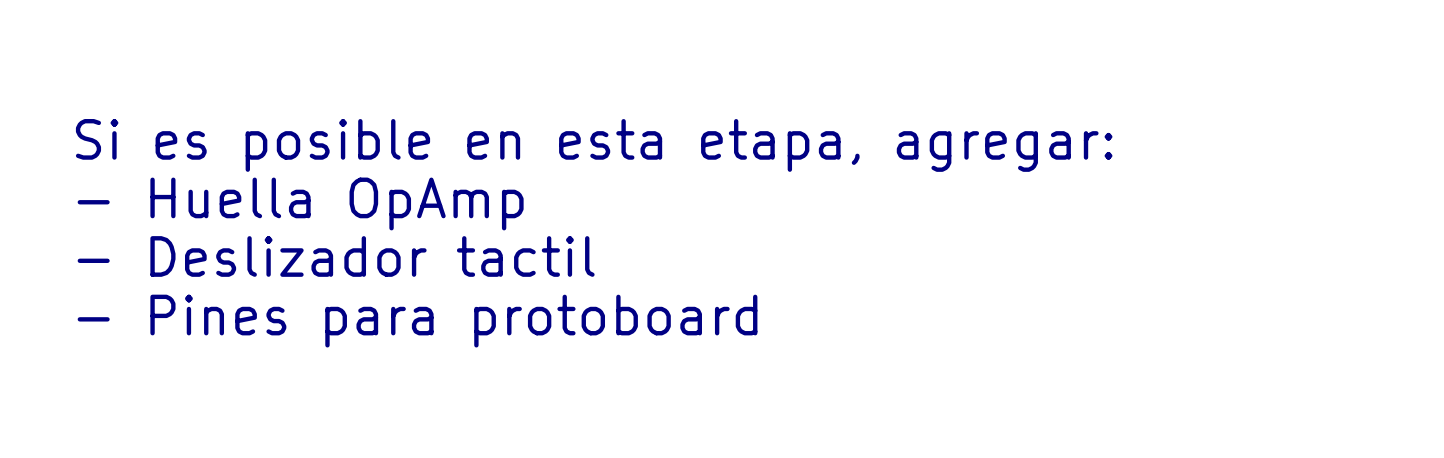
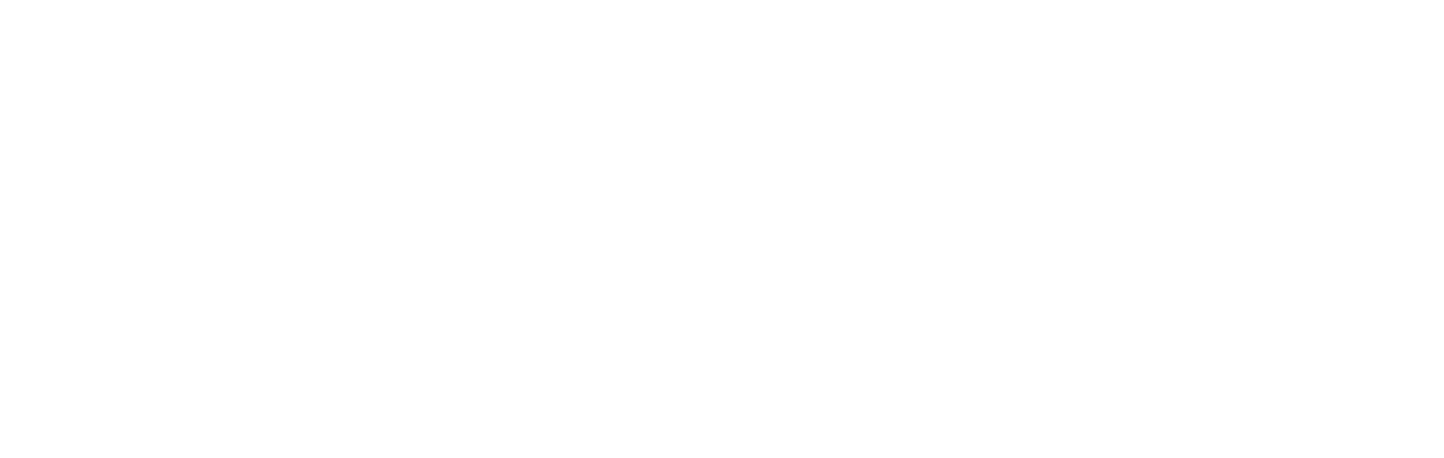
text: Si es posible en esta etapa, agregar: (594, 145) -> none
text: - Huella OpAmp (300, 203) -> none
text: - Deslizador tactil (336, 256) -> none
text: - Pines para protoboard (417, 321) -> none

